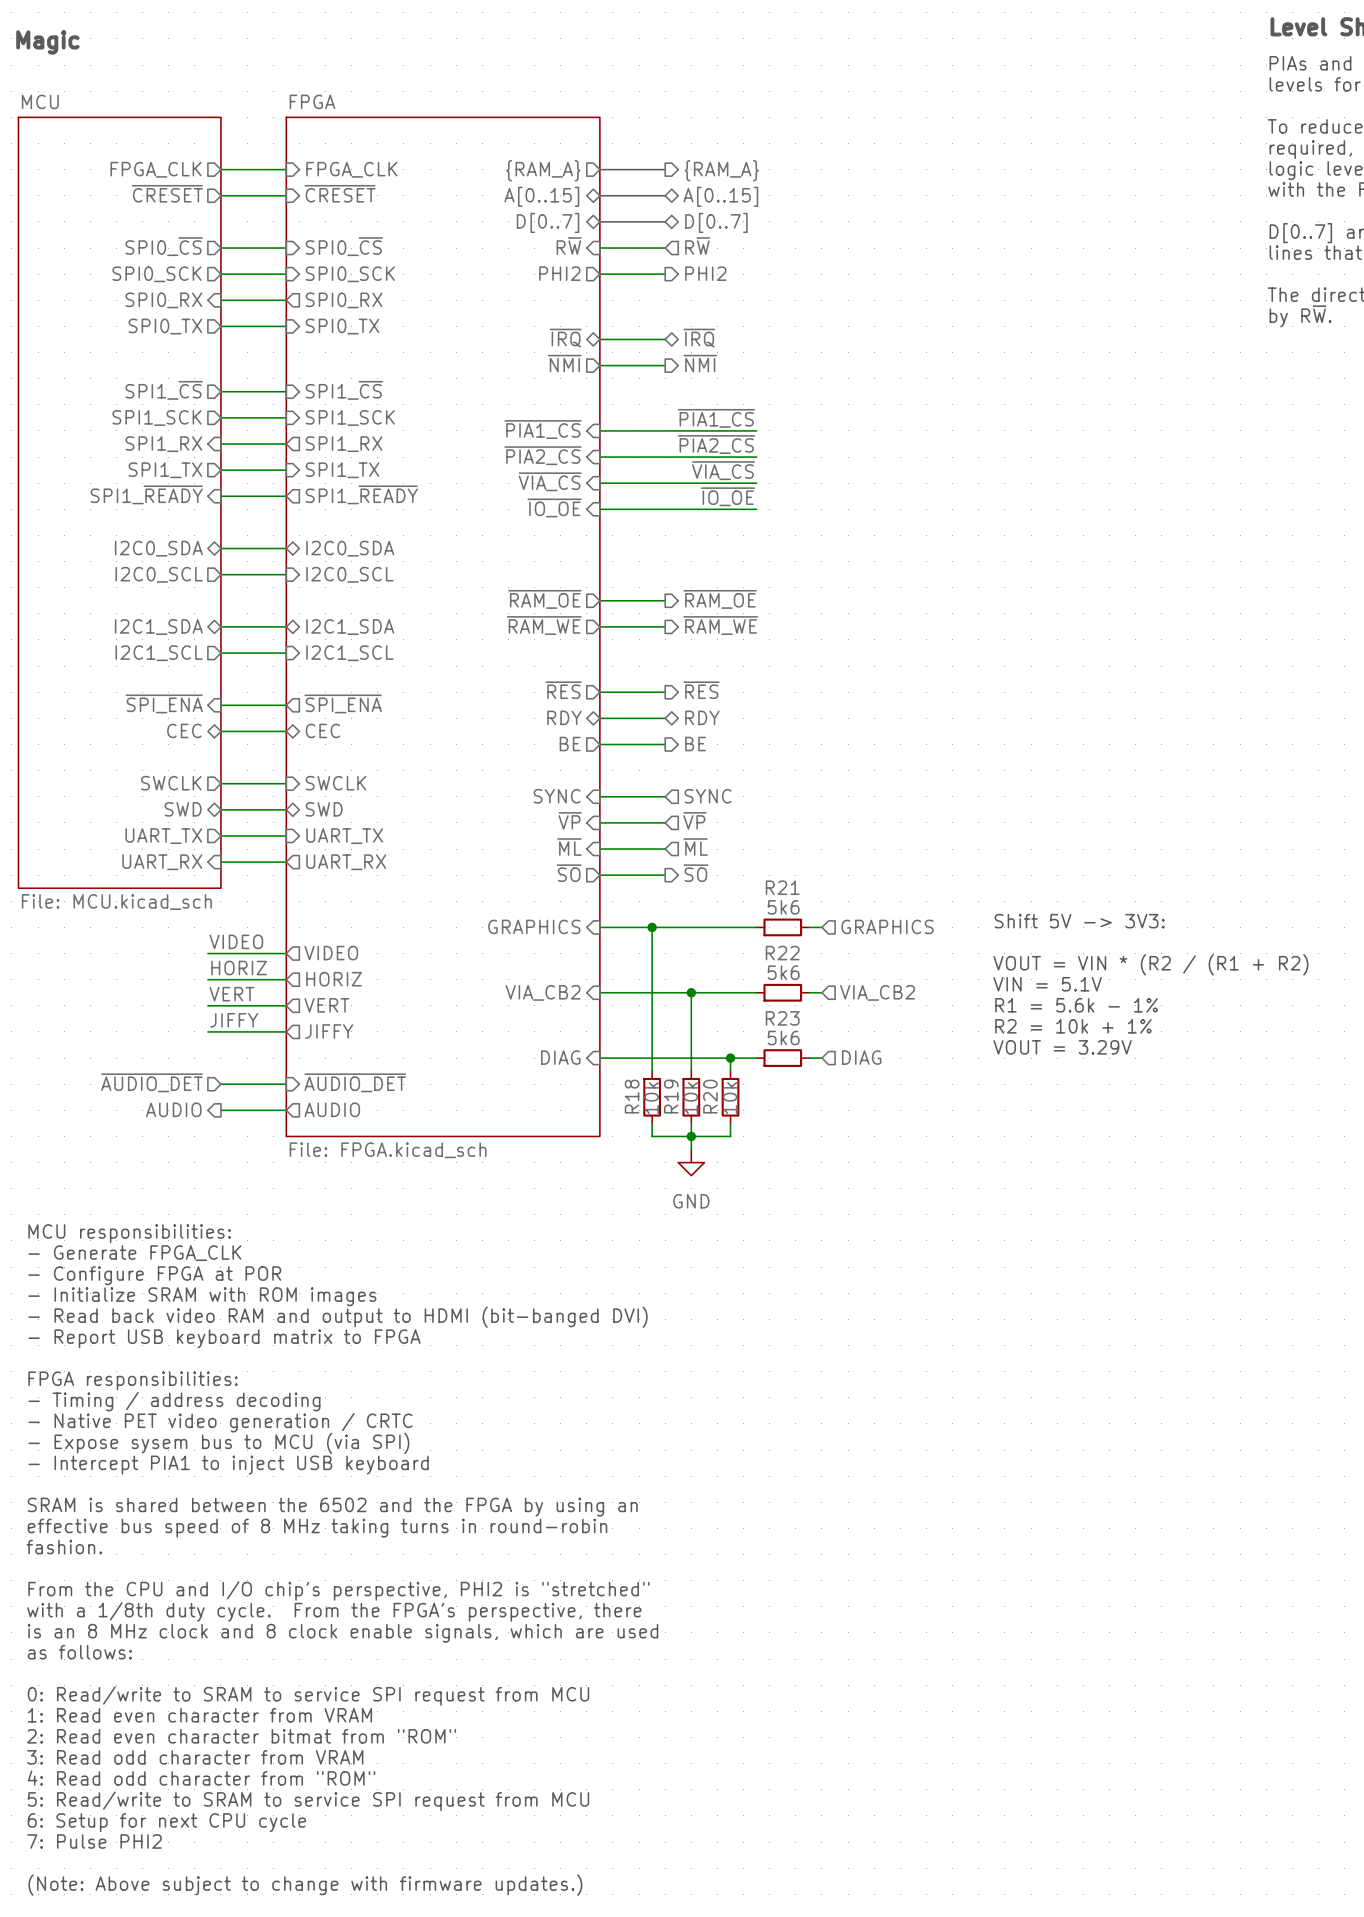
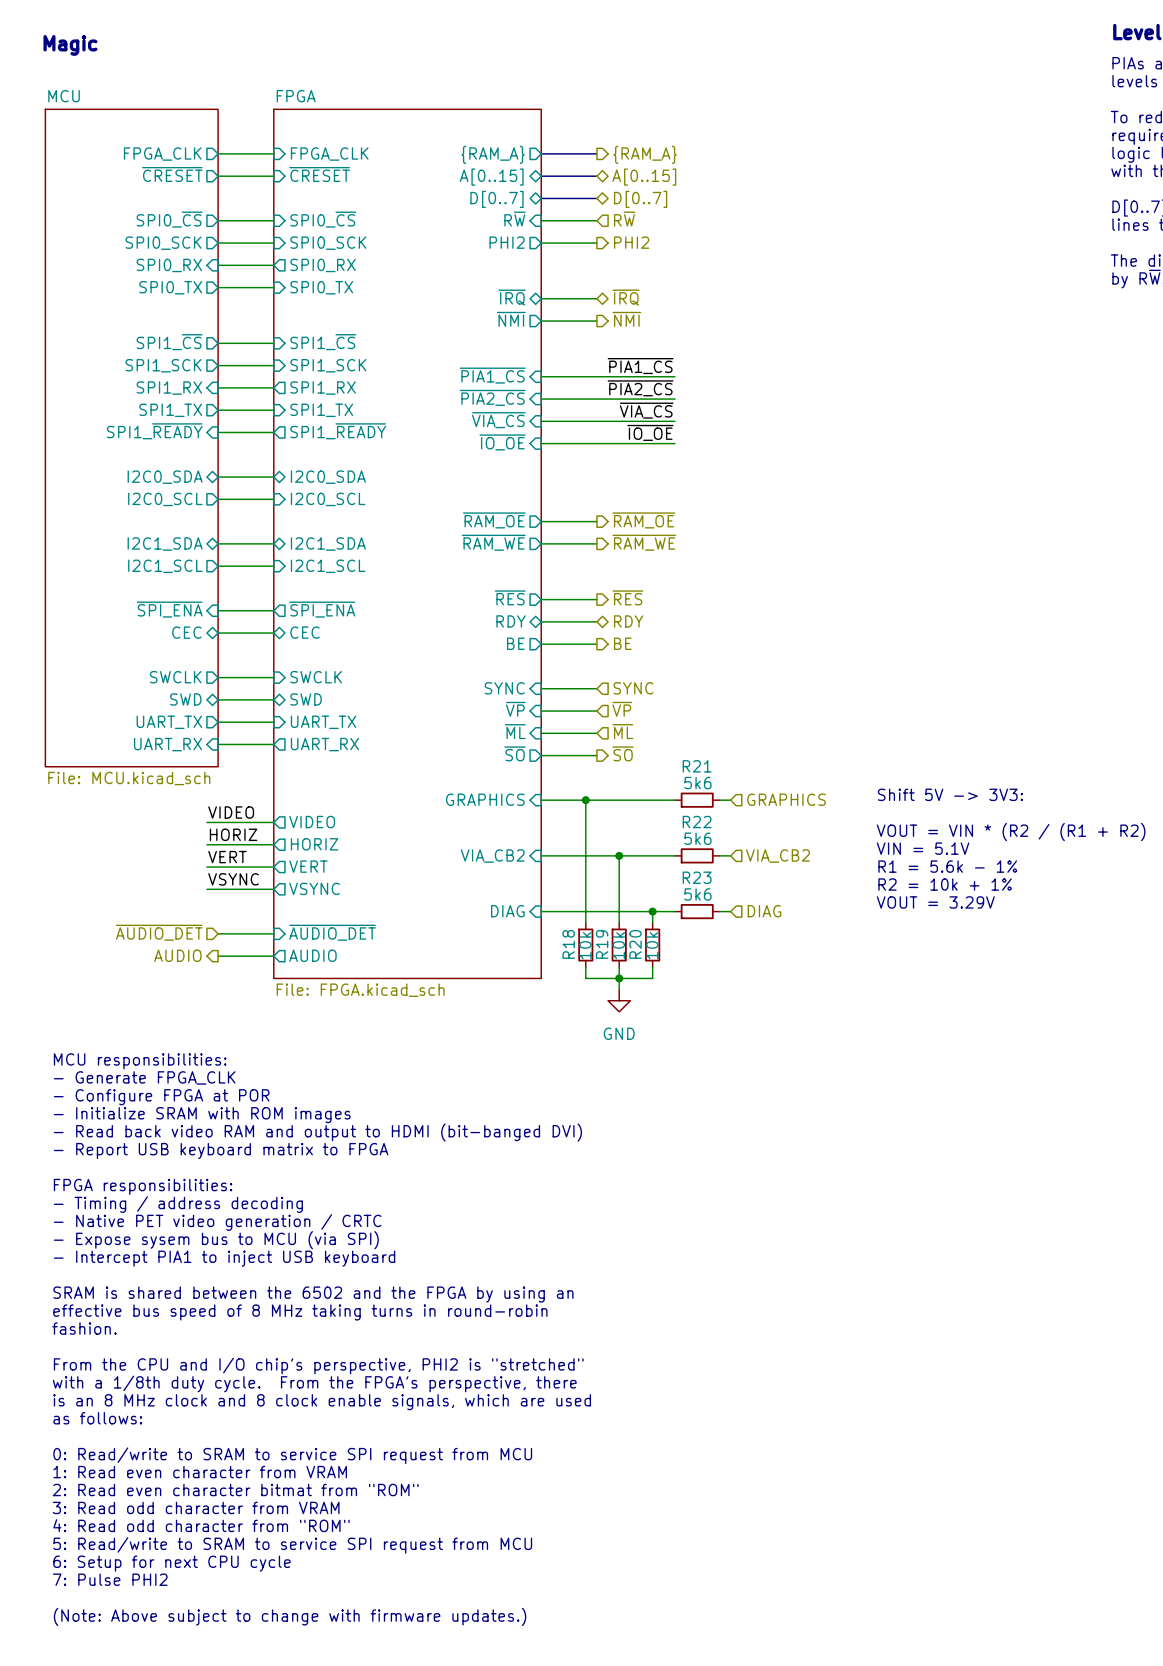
label: JIFFY (234, 1020) -> VSYNC (233, 879)
sheet pin: JIFFY (329, 1031) -> VSYNC (314, 888)

